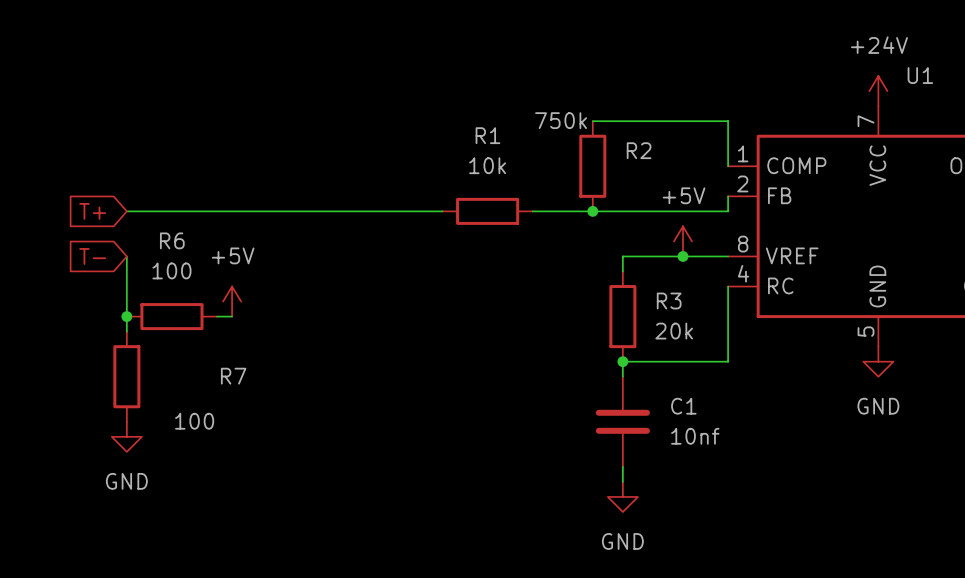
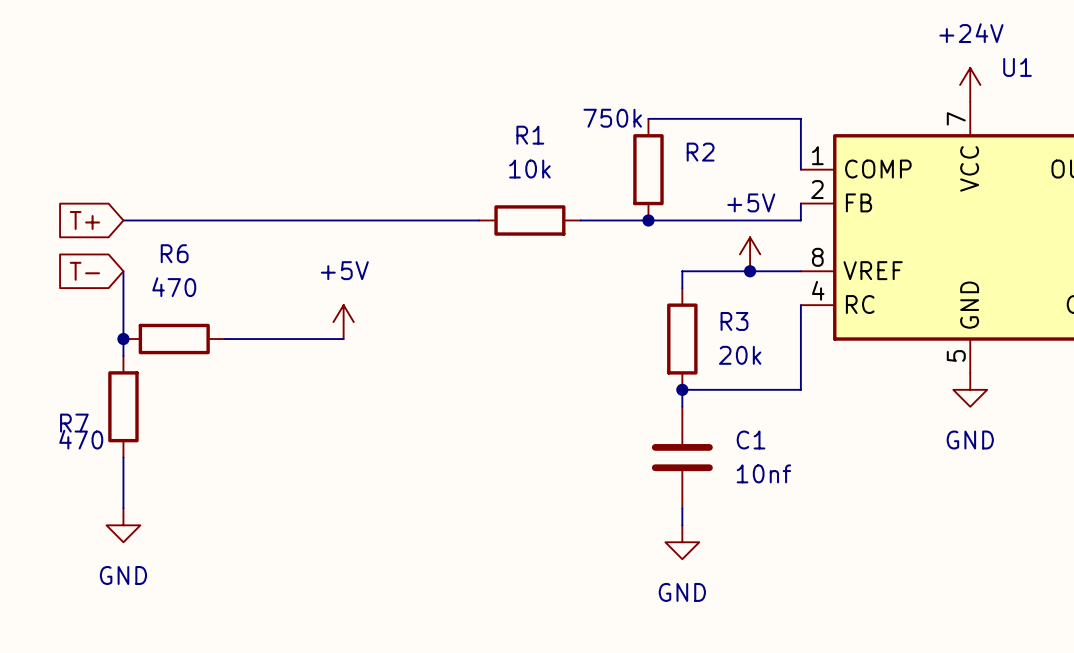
R6 value: 100 (171, 270) -> 470 (174, 287)
power symbol position: +5V (232, 301) -> +5V (343, 322)
wire: none -> (242, 339) (343, 339)
R7 name position: R7 (233, 376) -> R7 (74, 423)
wire: none -> (123, 457) (123, 508)
R7 value: 100 (194, 421) -> 470 (81, 439)
power symbol position: GND (126, 436) -> GND (123, 525)

